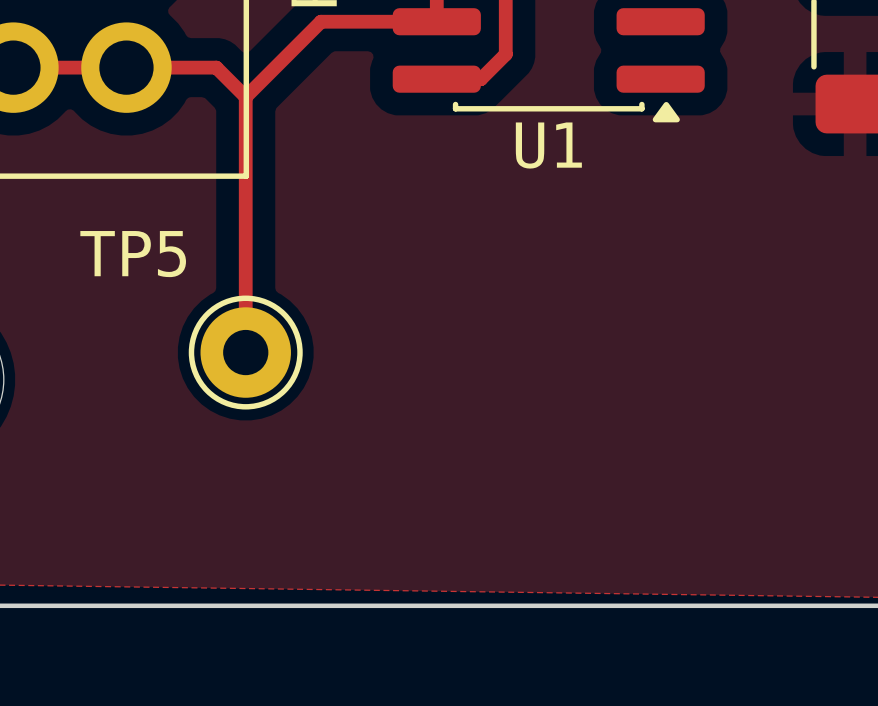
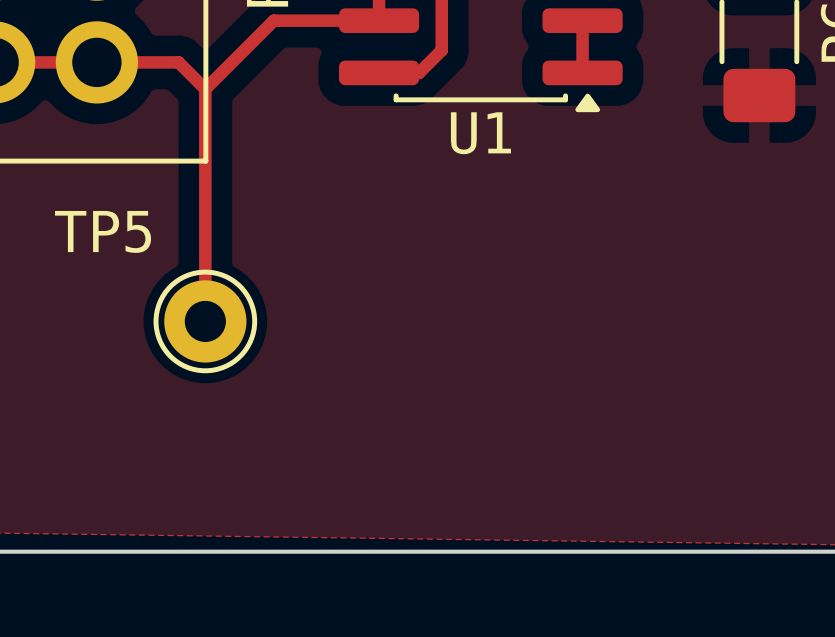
track: none -> (582, 20) (582, 72)

